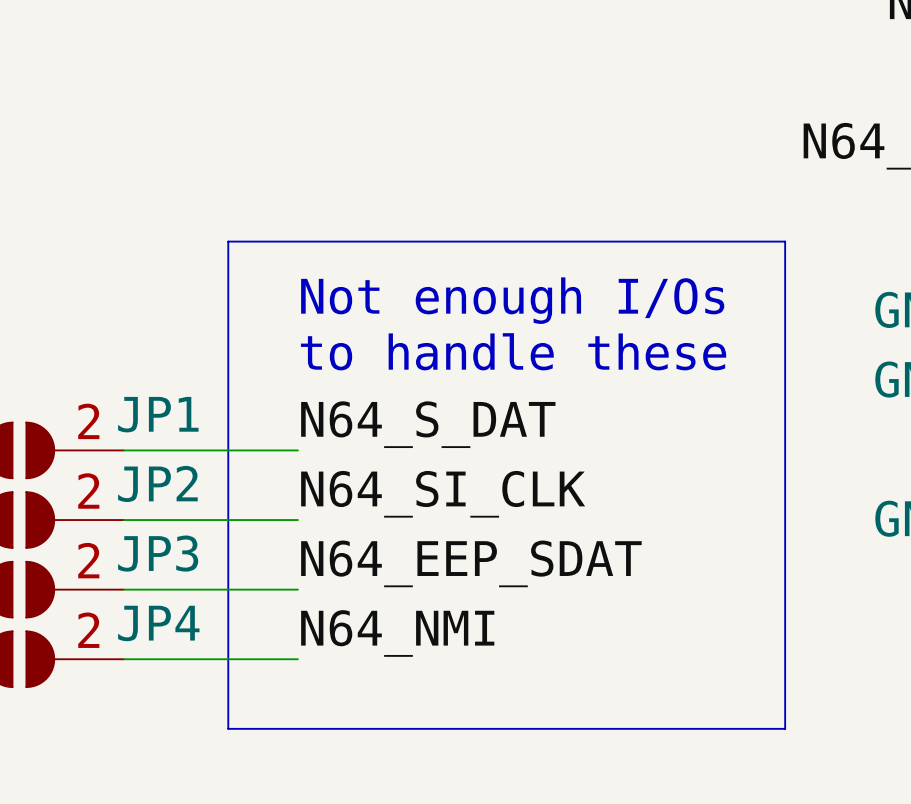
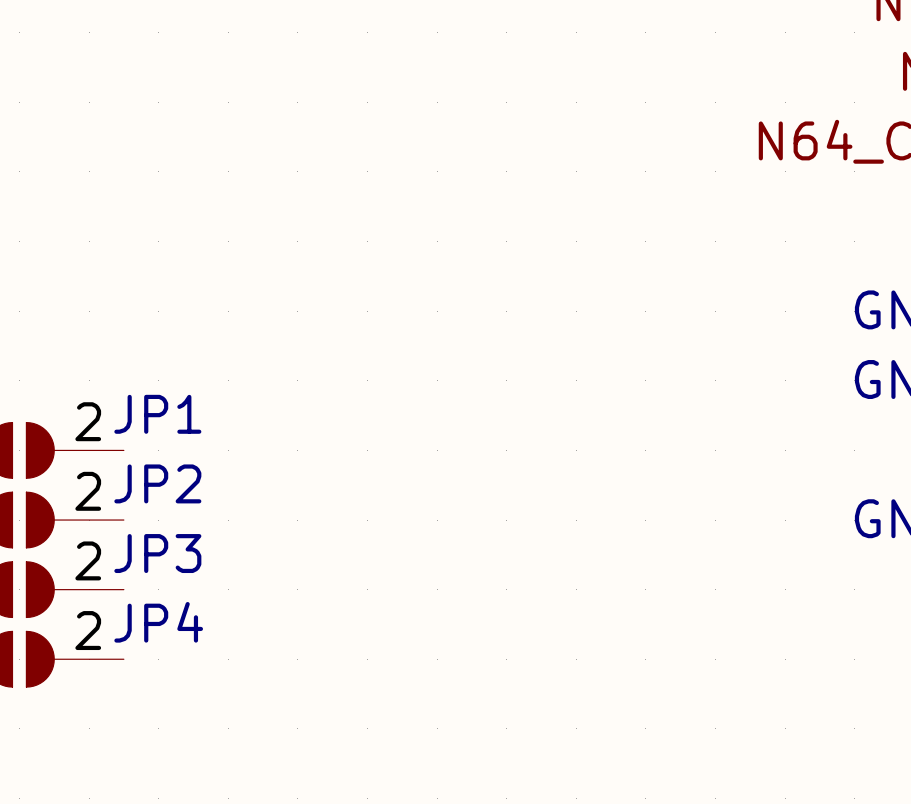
line: (228, 241) (228, 728) (785, 728) (785, 241) (228, 241) -> none
text: Not enough I/Os (512, 300) -> none
text: to handle these (513, 351) -> none
label: N64_S_DAT (428, 424) -> none
wire: (123, 450) (297, 450) -> none
label: N64_SI_CLK (443, 494) -> none
wire: (123, 520) (297, 520) -> none
label: N64_EEP_SDAT (471, 563) -> none
wire: (123, 589) (297, 589) -> none
label: N64_NMI (397, 633) -> none
wire: (123, 659) (297, 659) -> none

